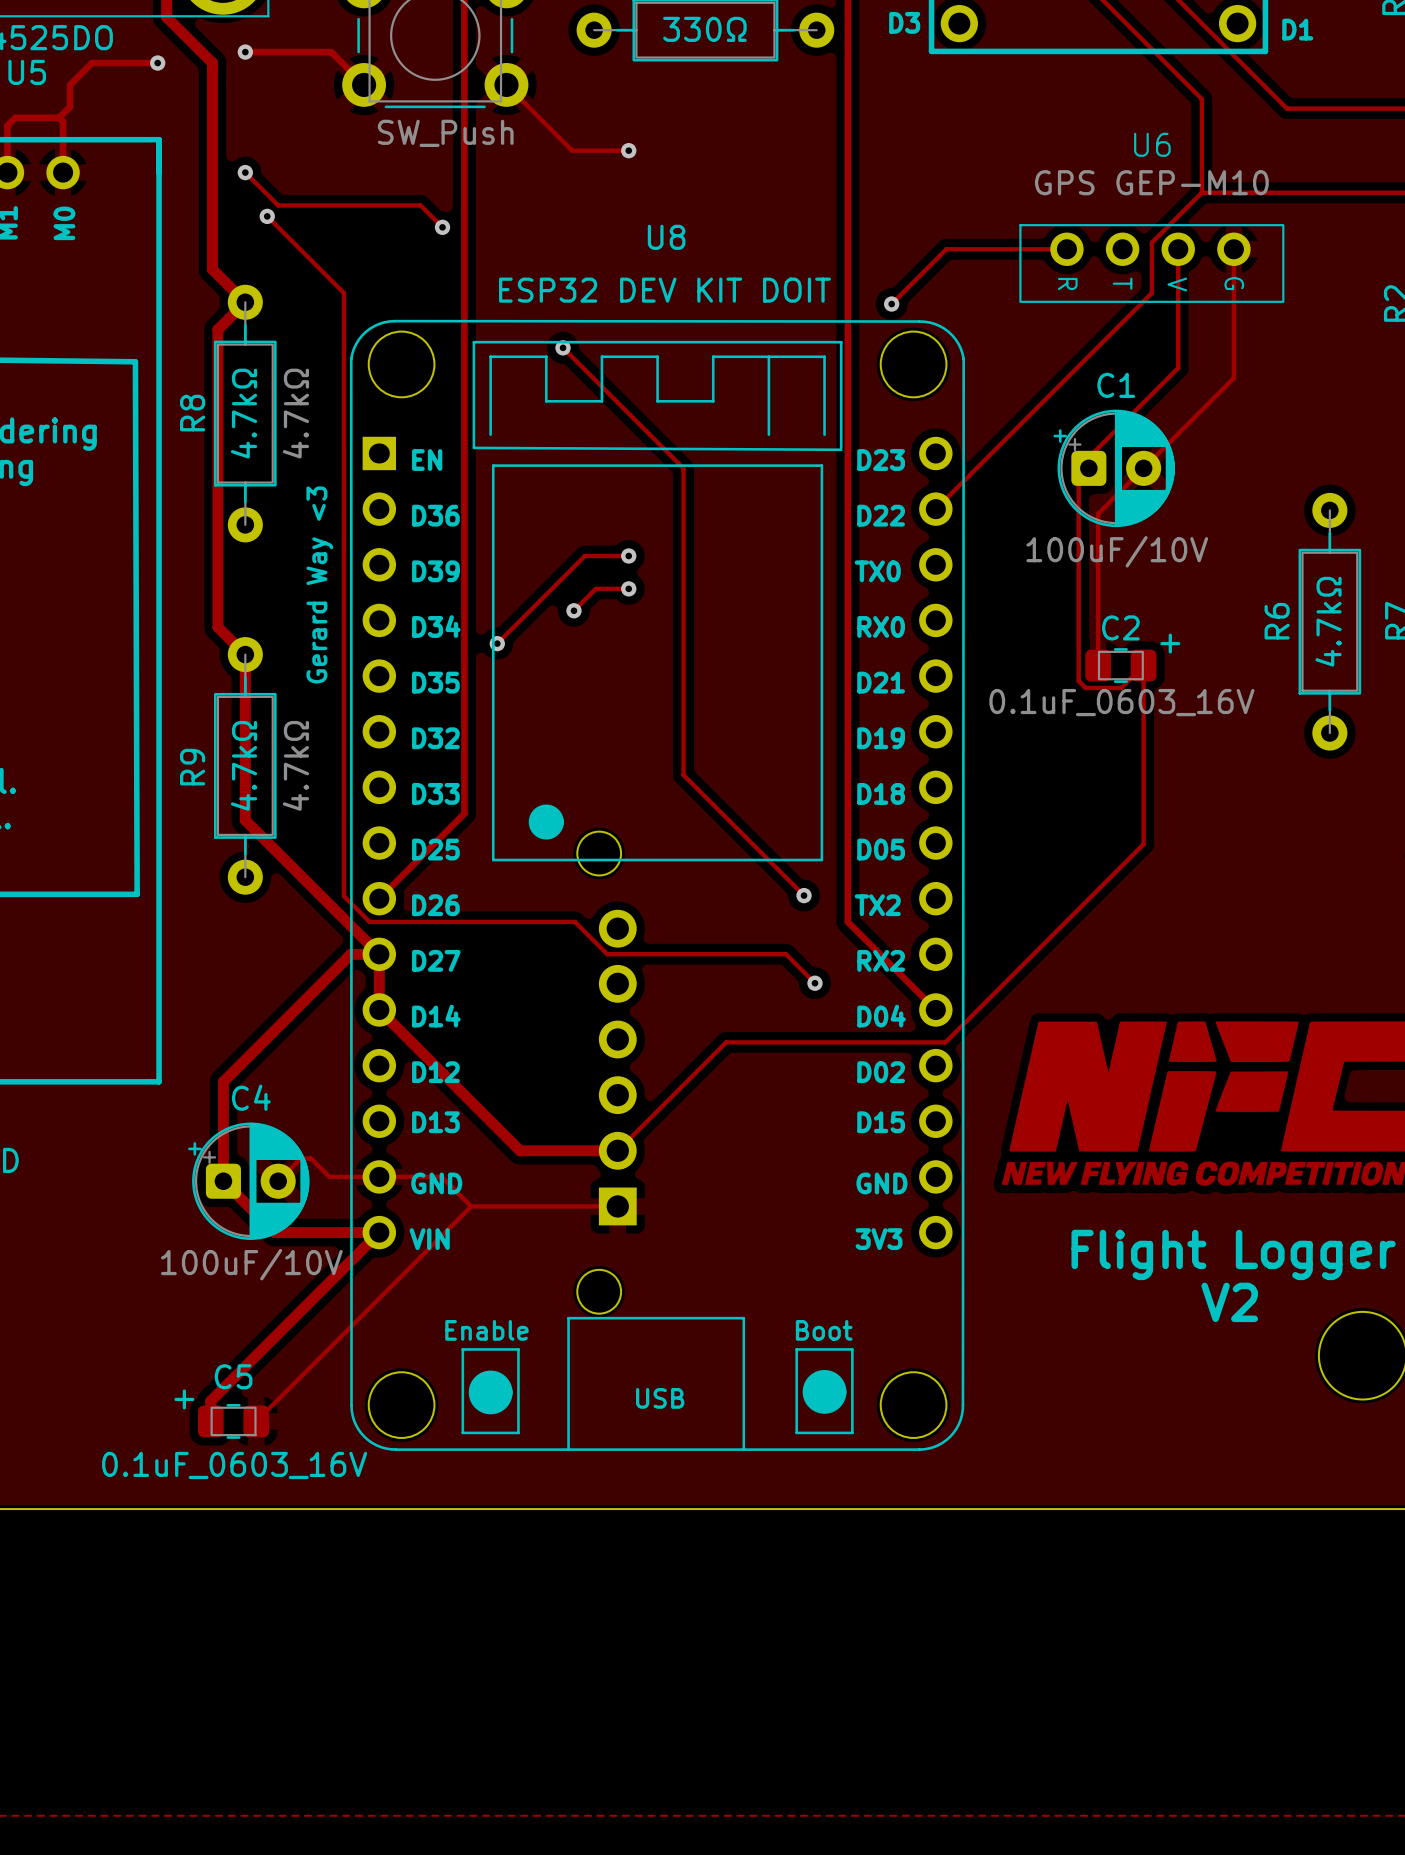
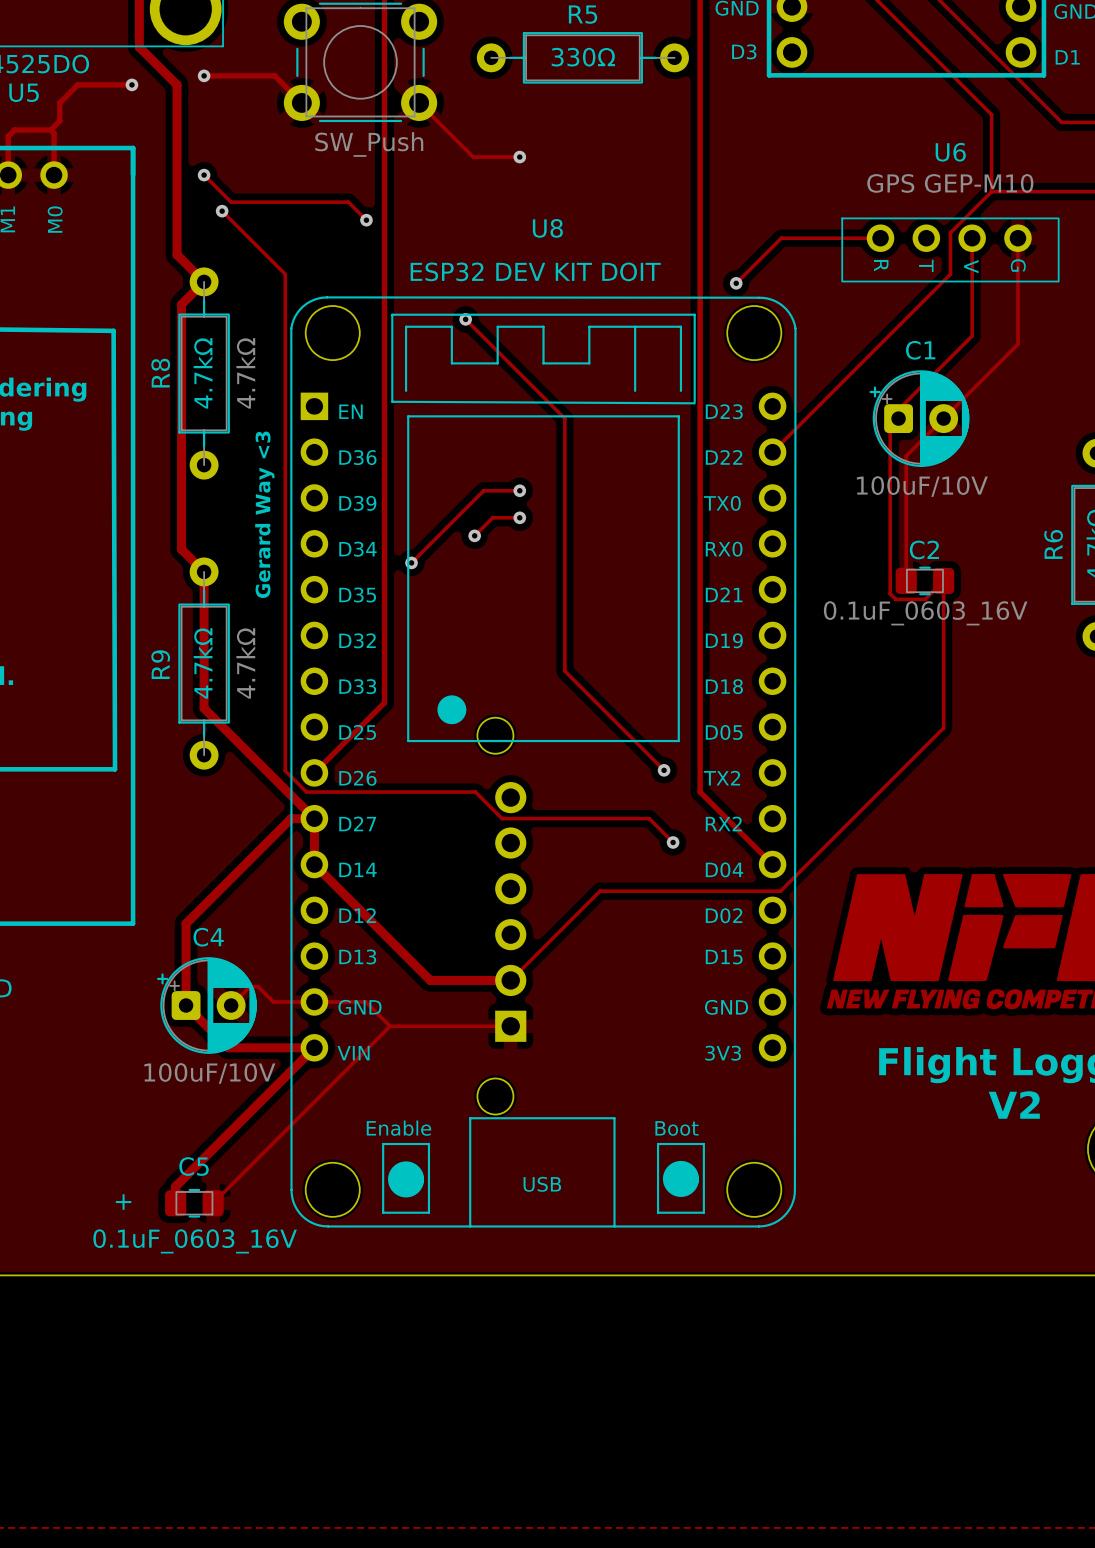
text: + (1170, 643) -> none
text position: + (184, 1399) -> + (123, 1202)

